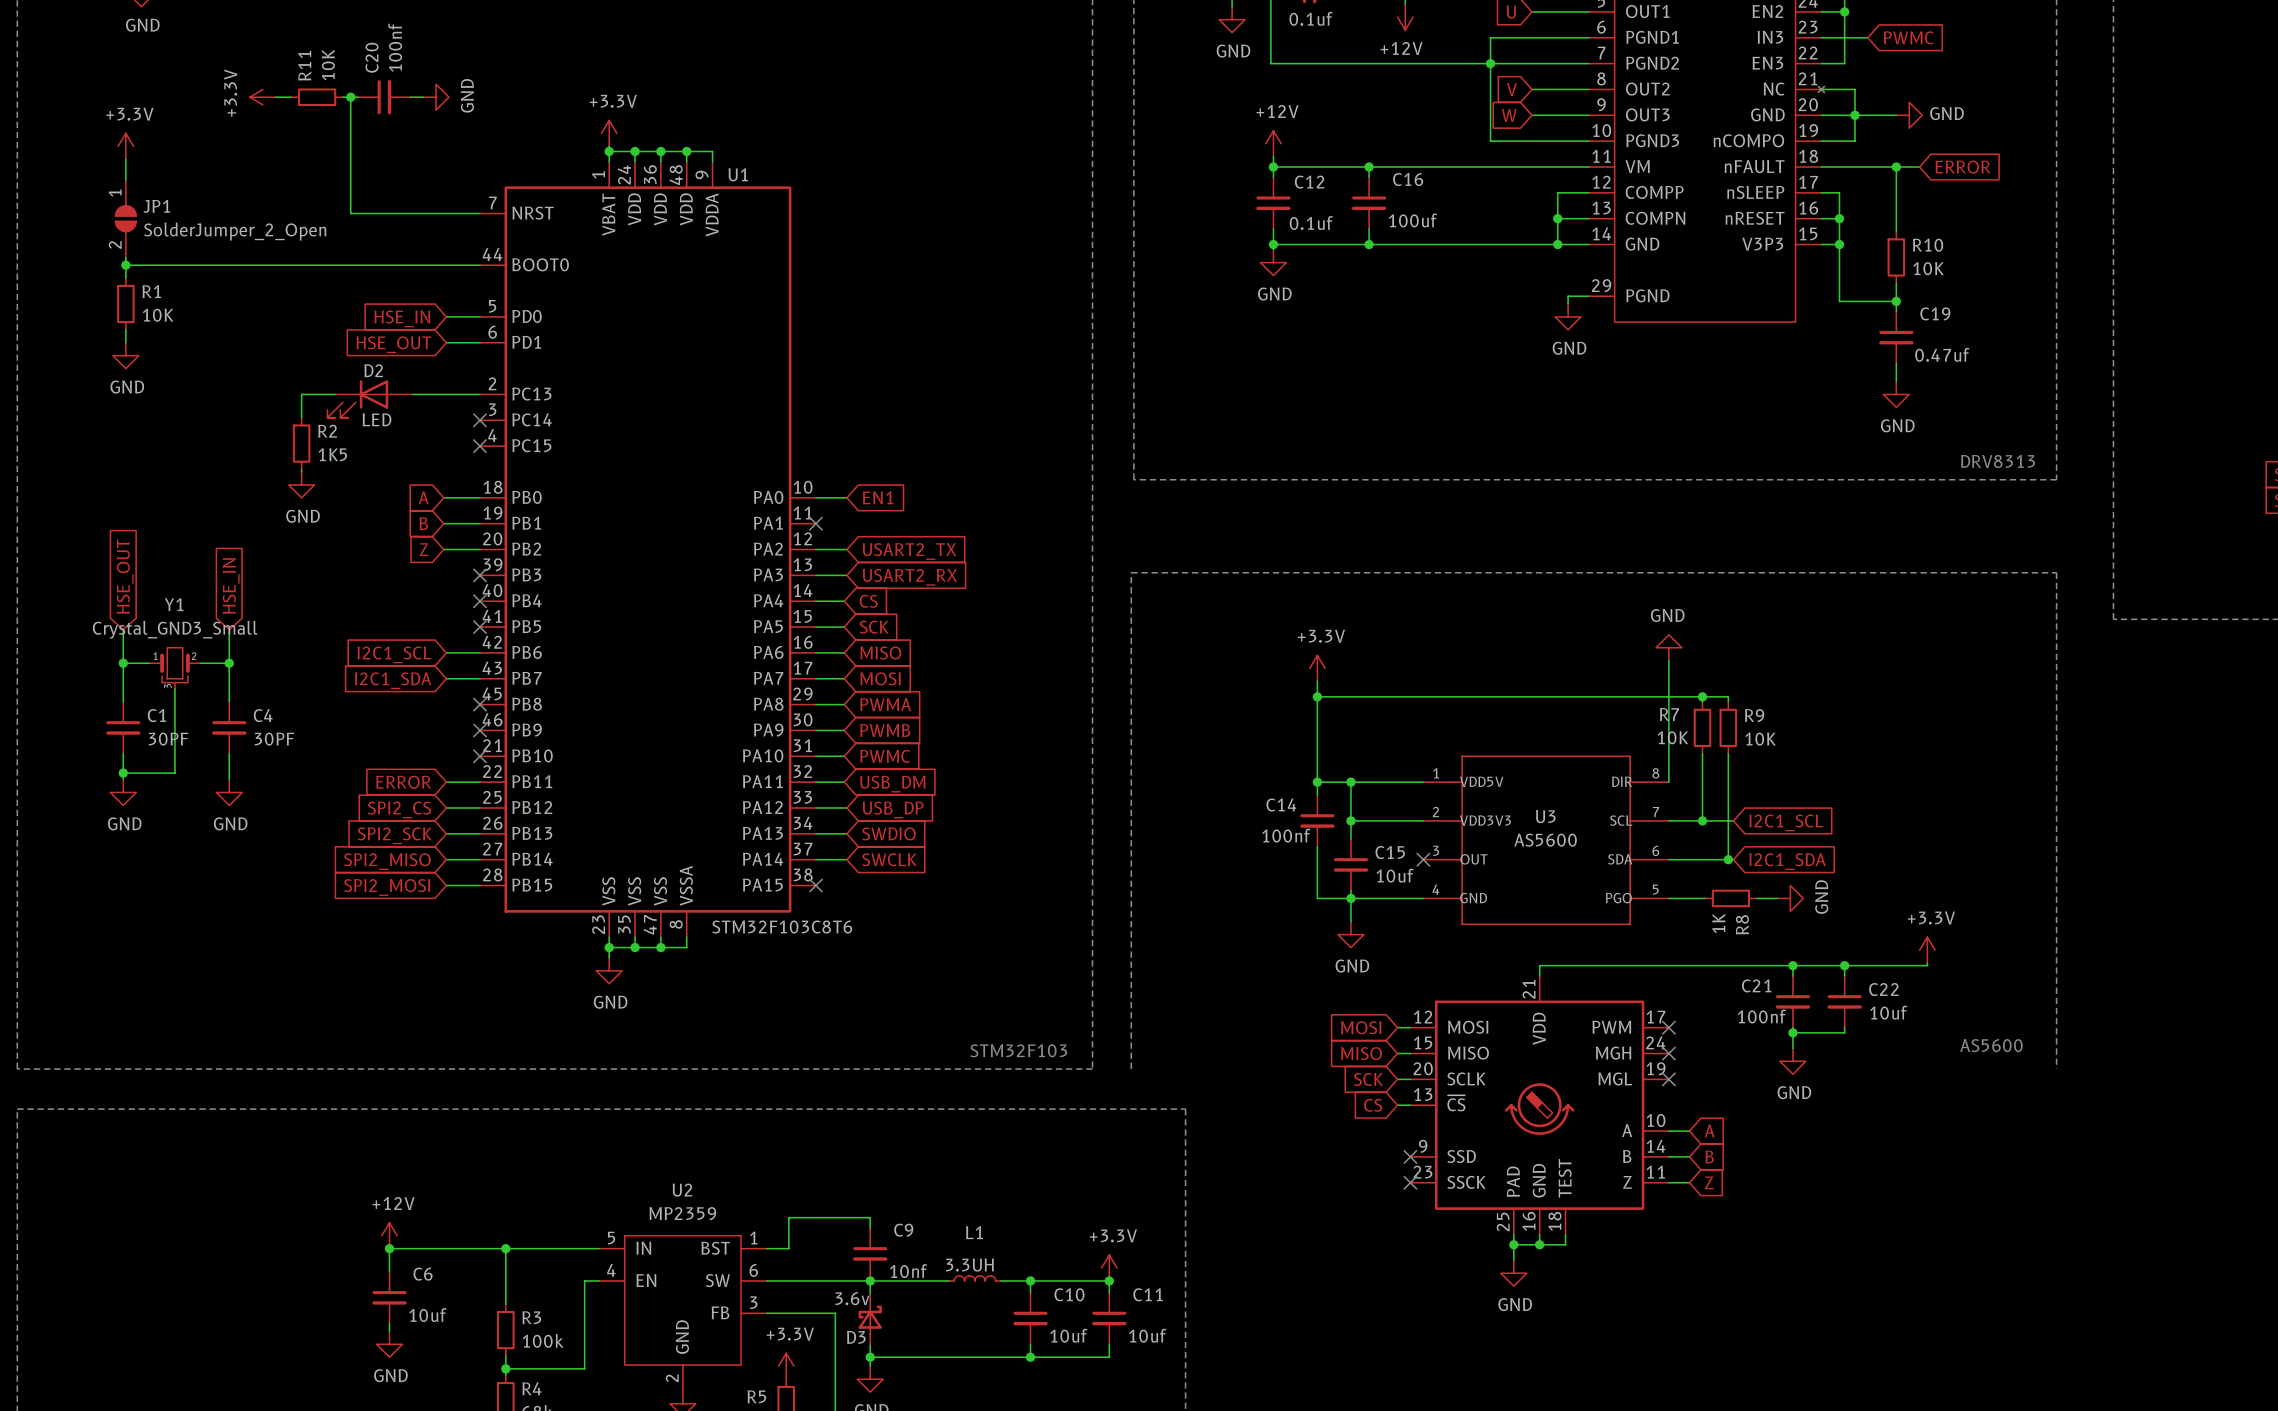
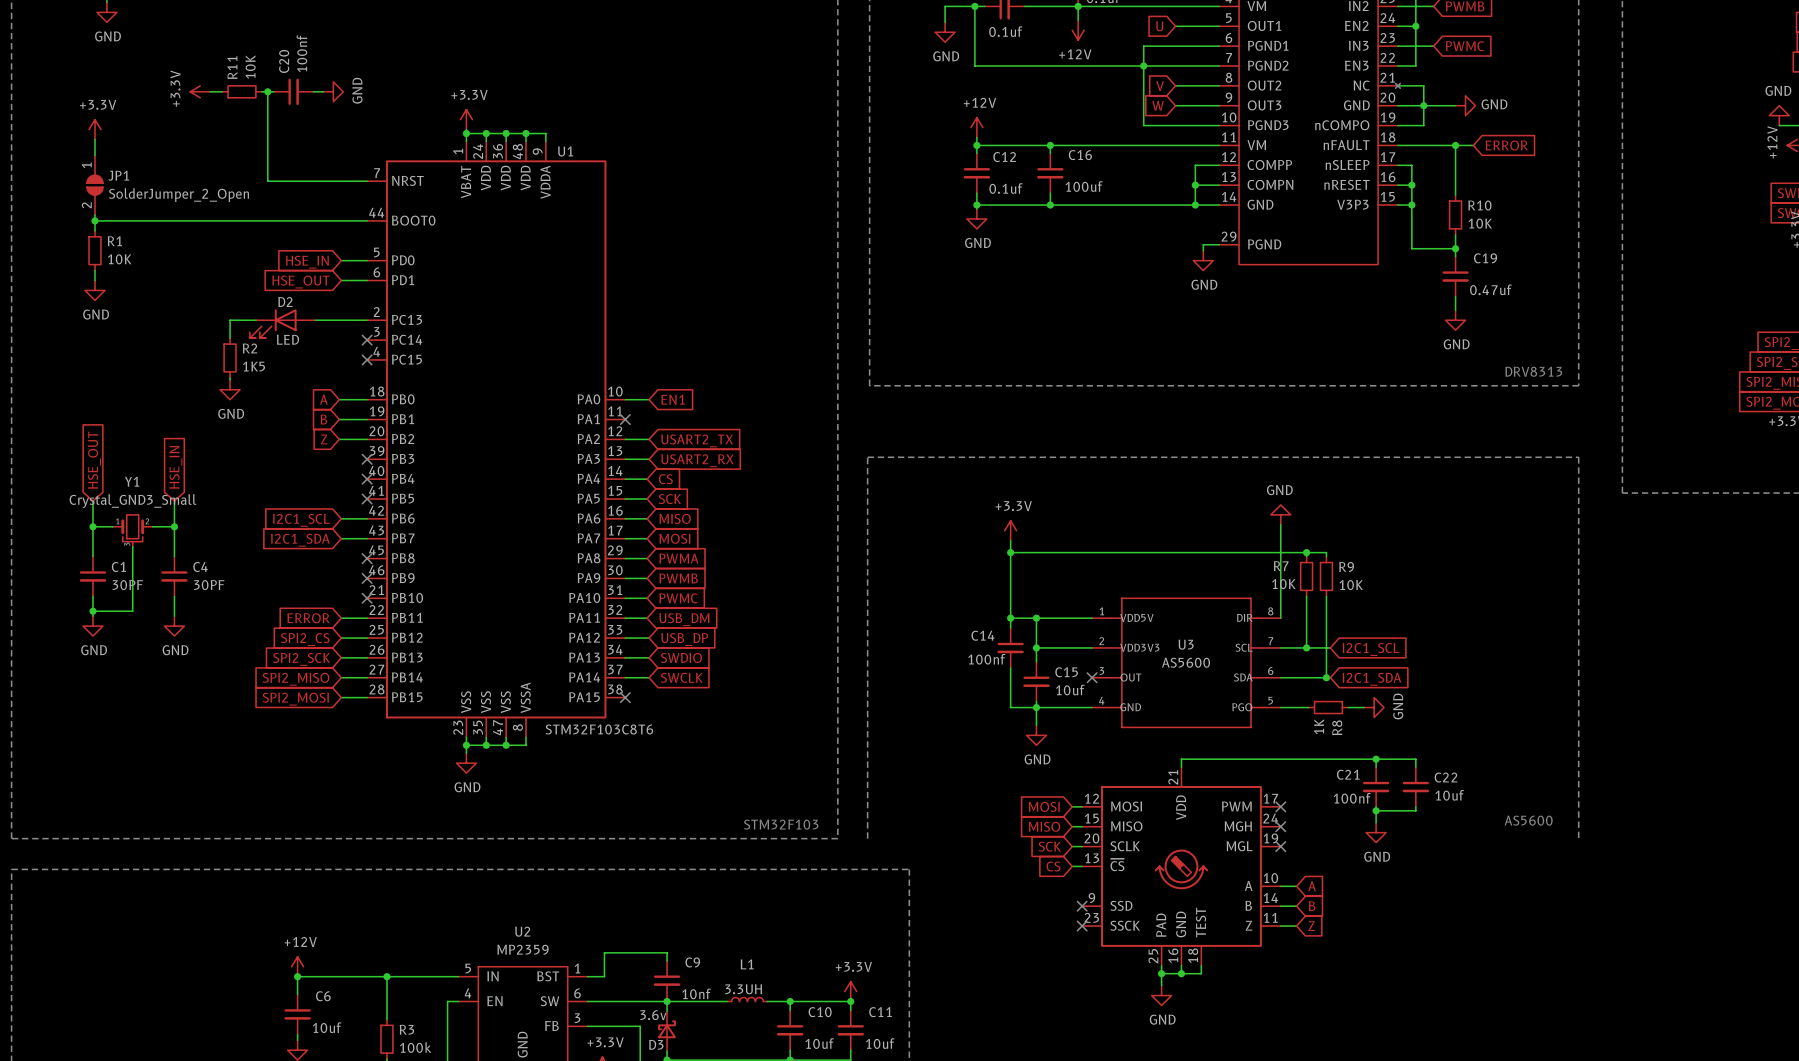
power symbol: +3.3V (1927, 950) -> none
wire: (1927, 963) (1927, 965) (1844, 965) -> none
junction: (1844, 965) -> none

